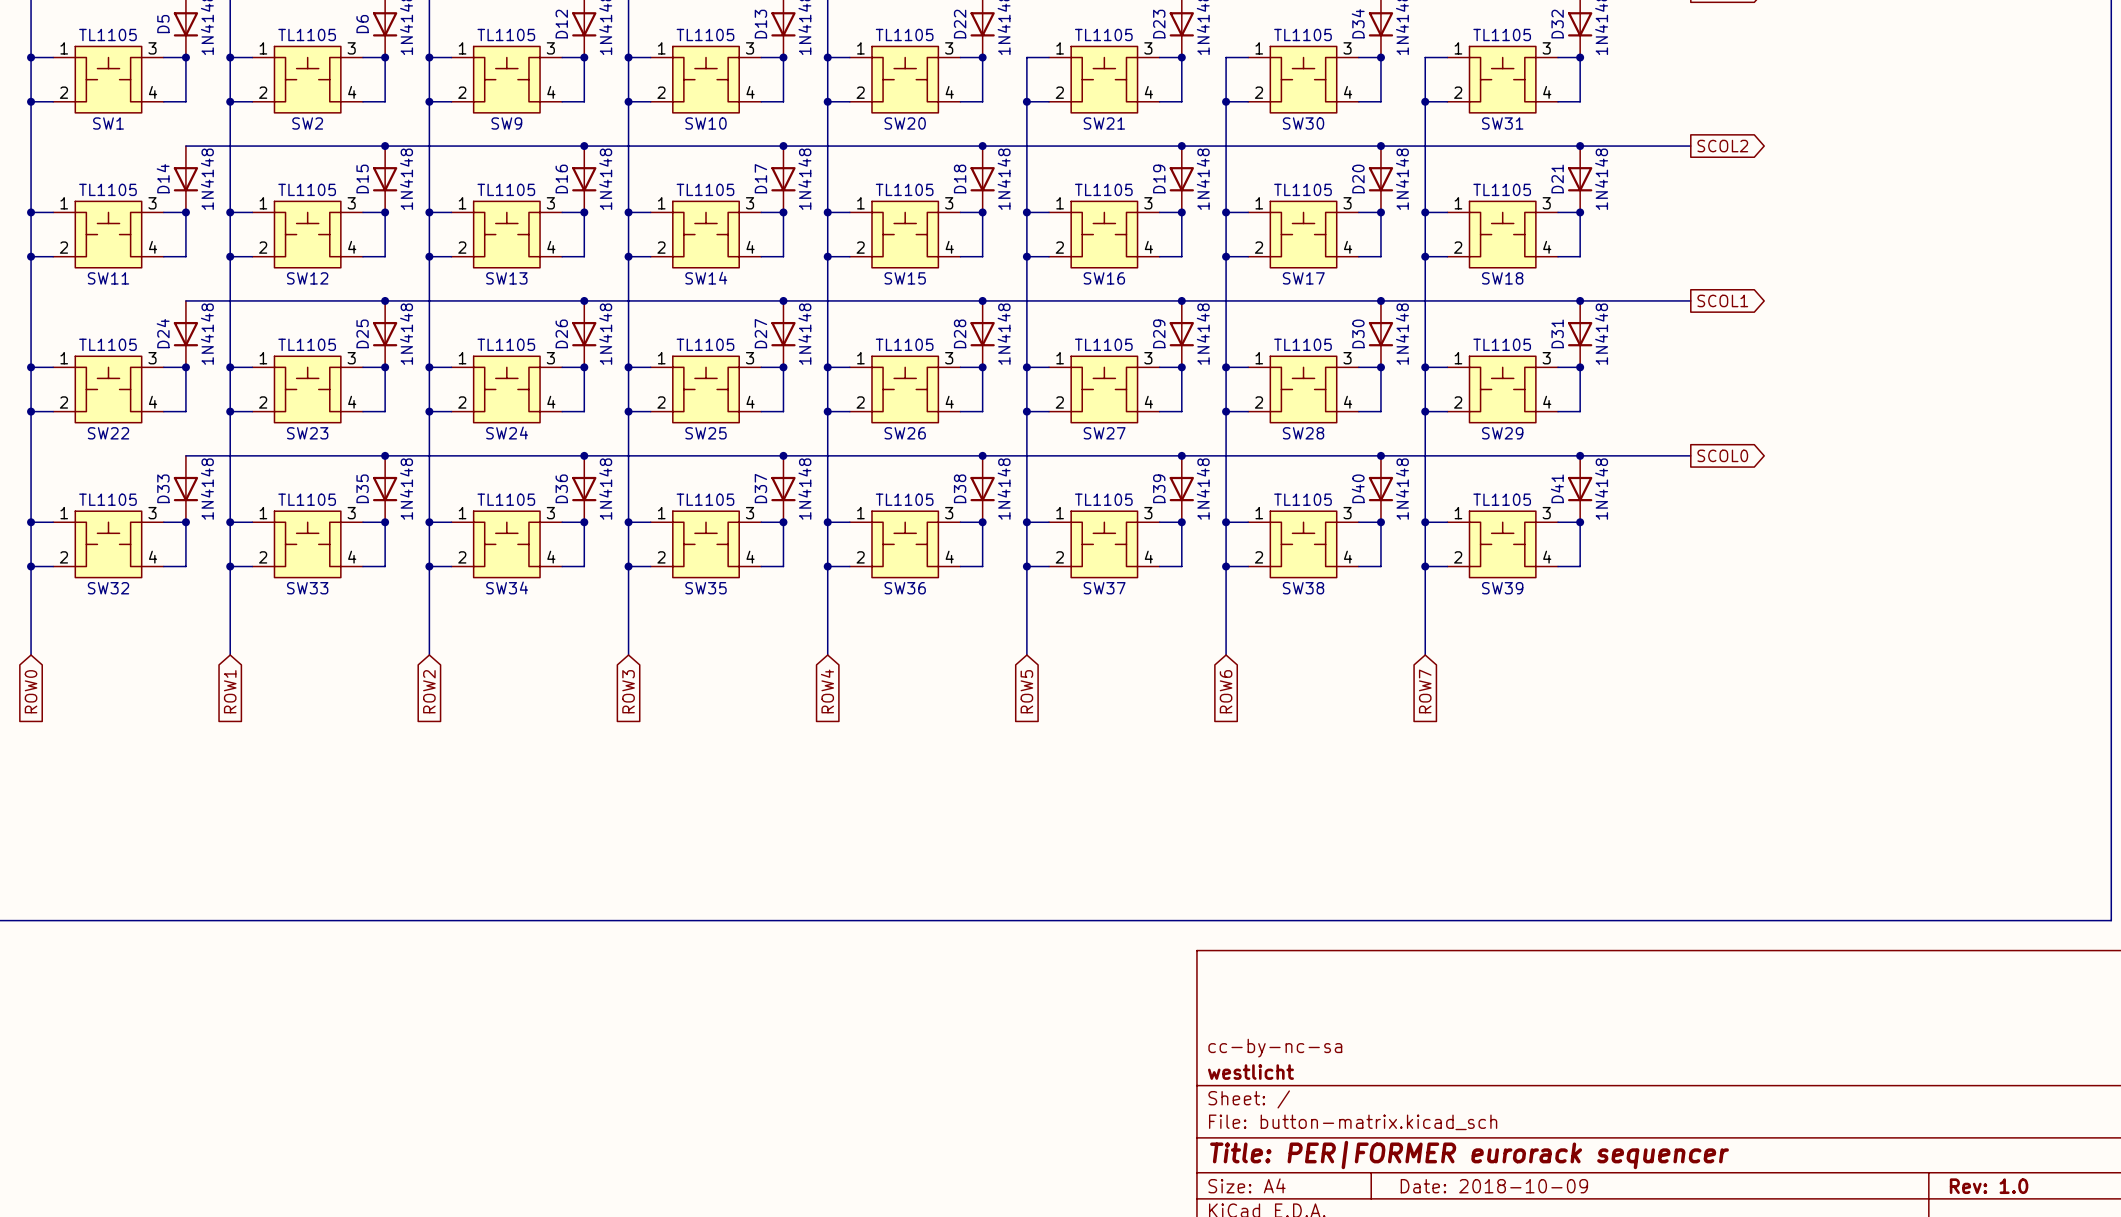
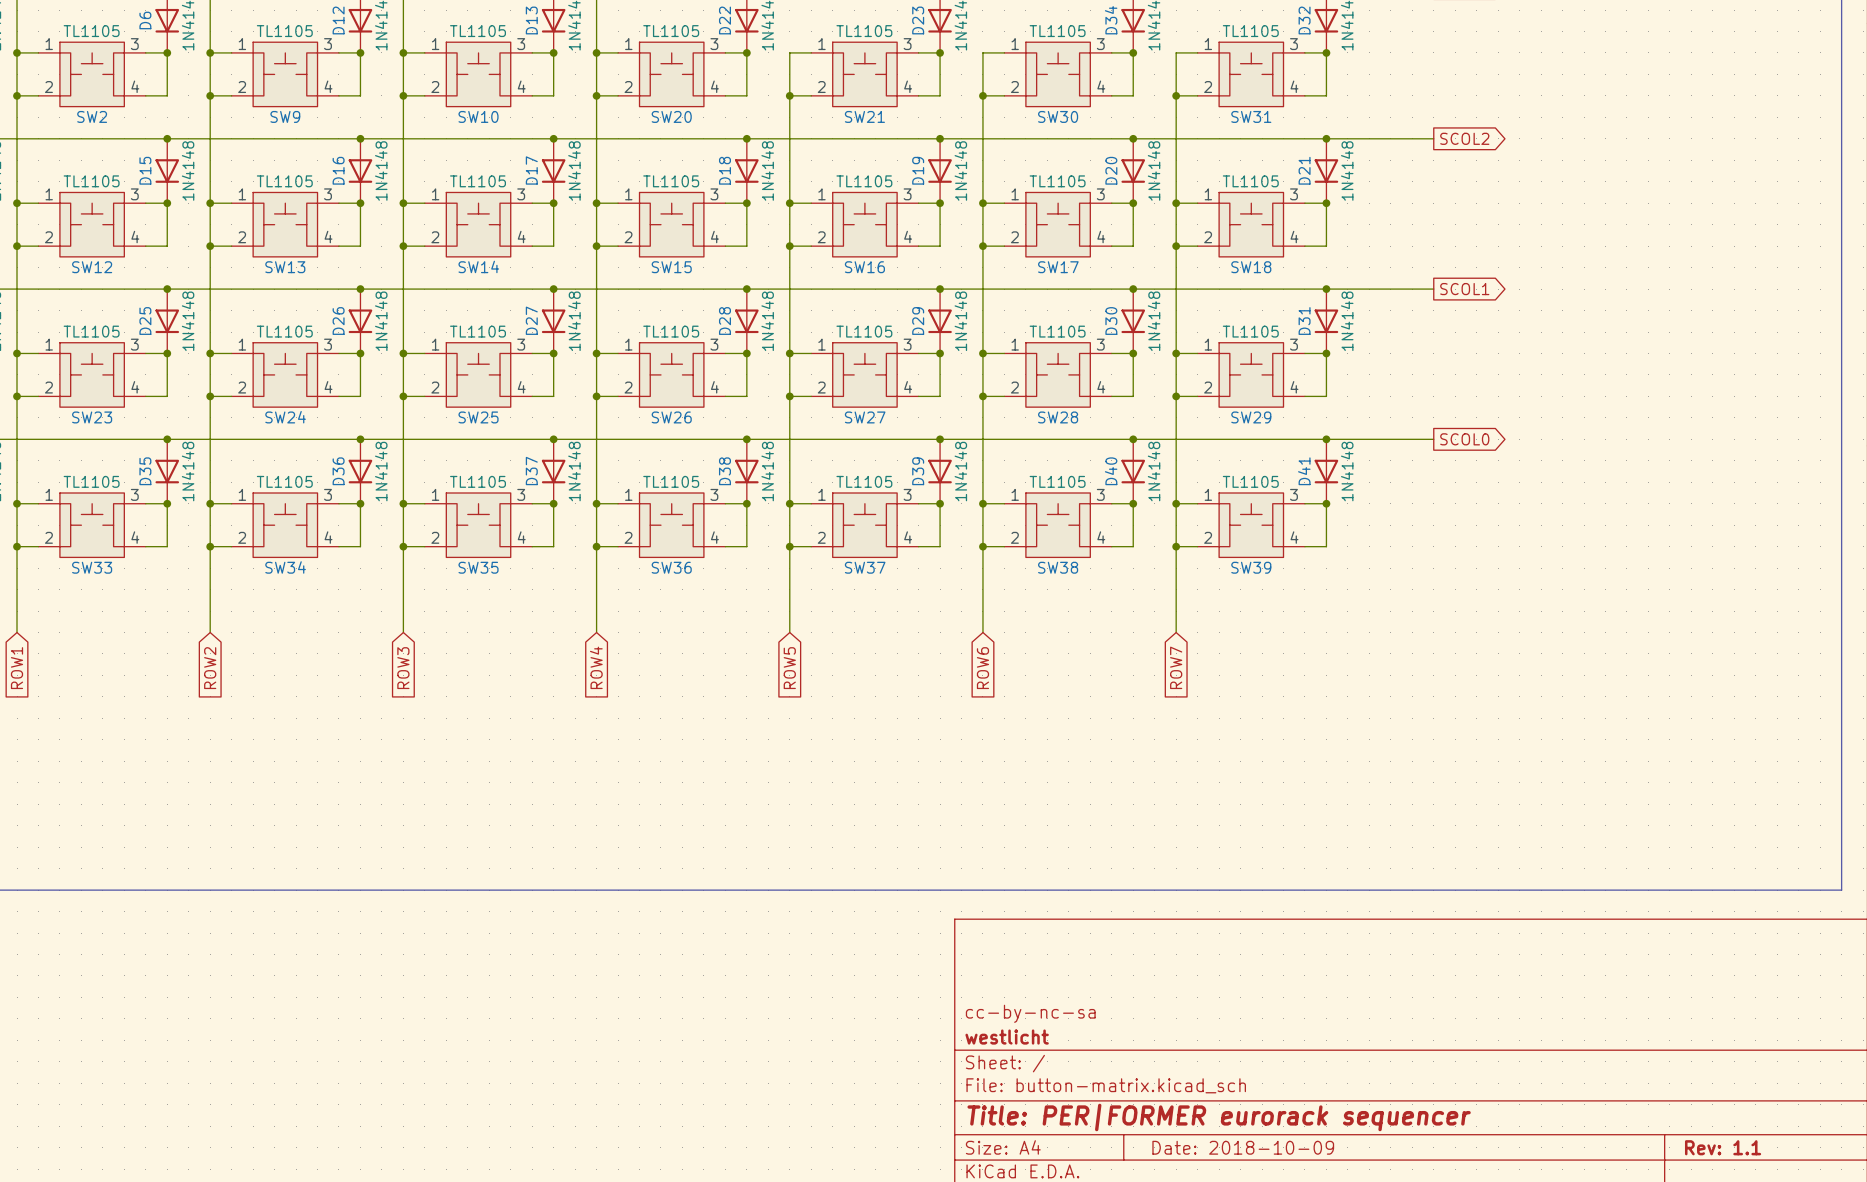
title block: Rev: 1.0 (1989, 1186) -> Rev: 1.1 (1723, 1147)

